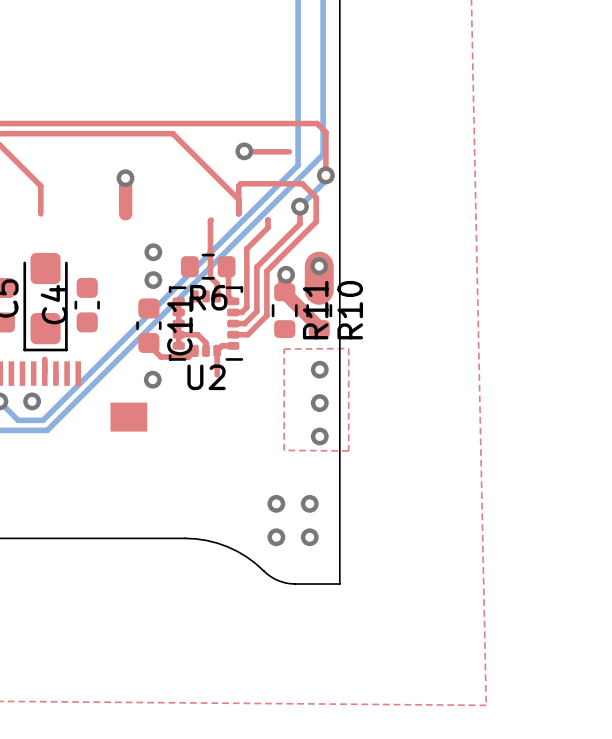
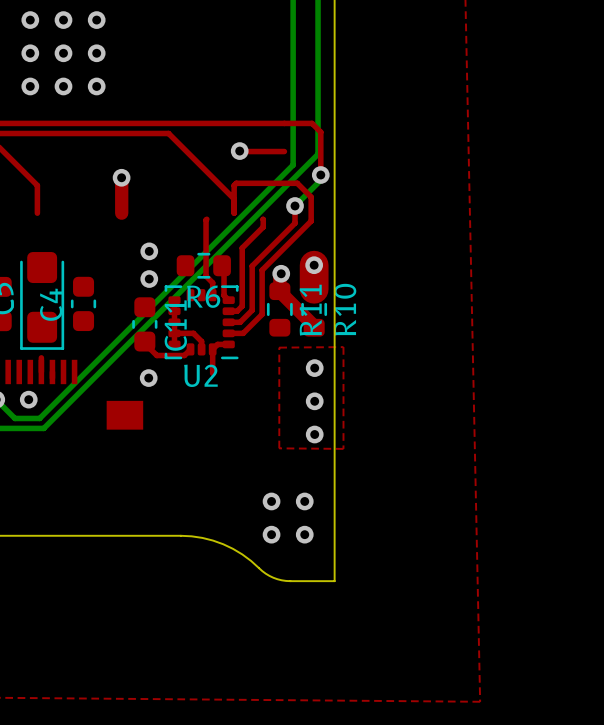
via: none -> (30, 20)
via: none -> (63, 20)
via: none -> (96, 20)
via: none -> (30, 53)
via: none -> (63, 53)
via: none -> (96, 53)
via: none -> (30, 86)
via: none -> (63, 86)
via: none -> (96, 86)

